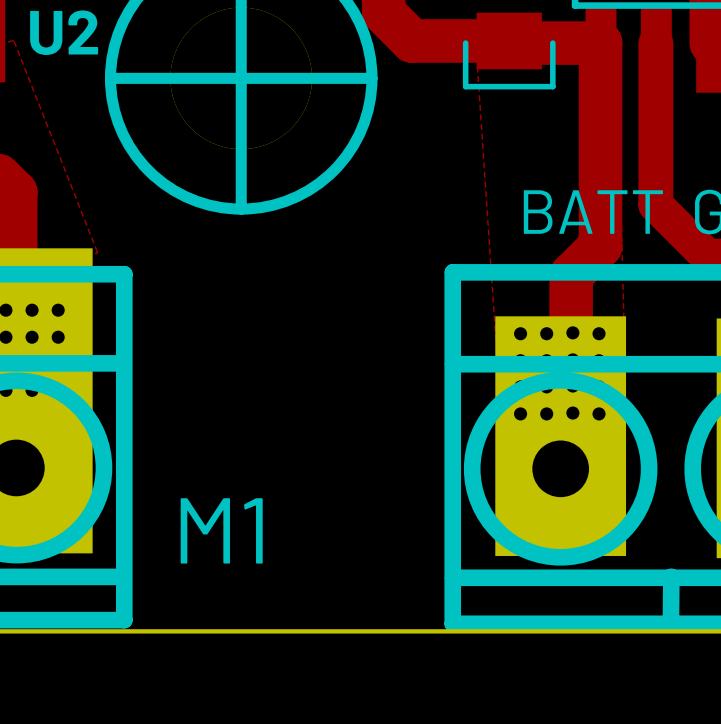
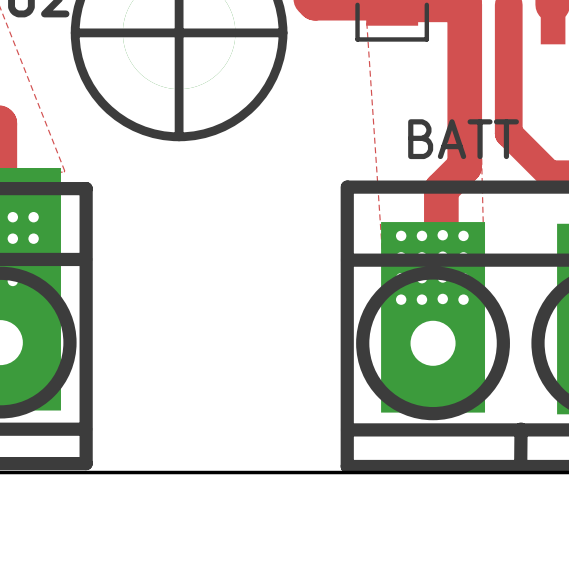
part value: M1 (221, 530) -> none

